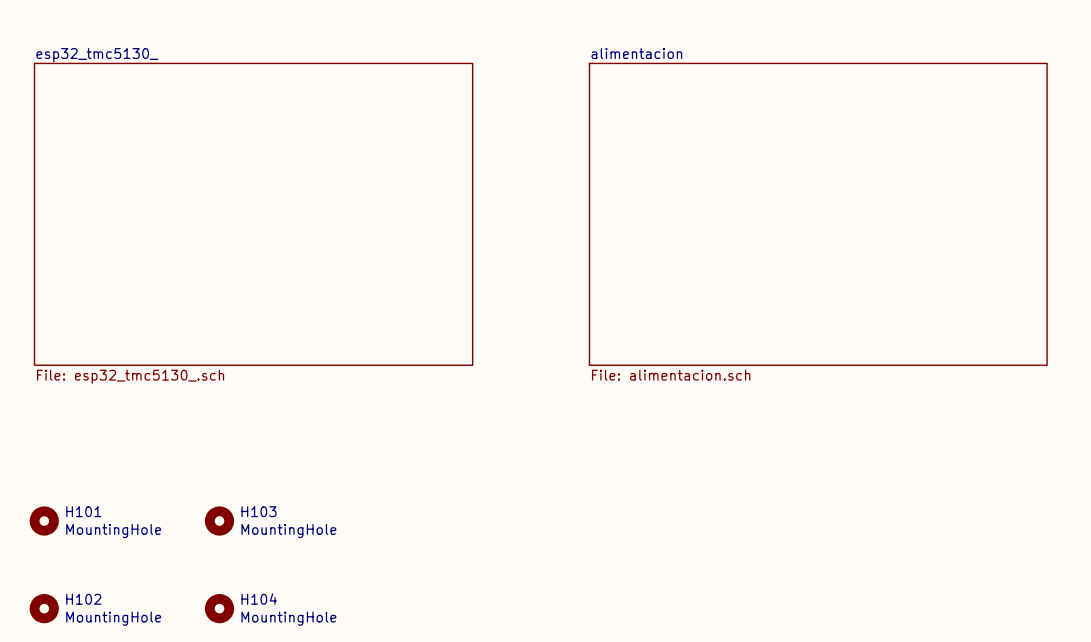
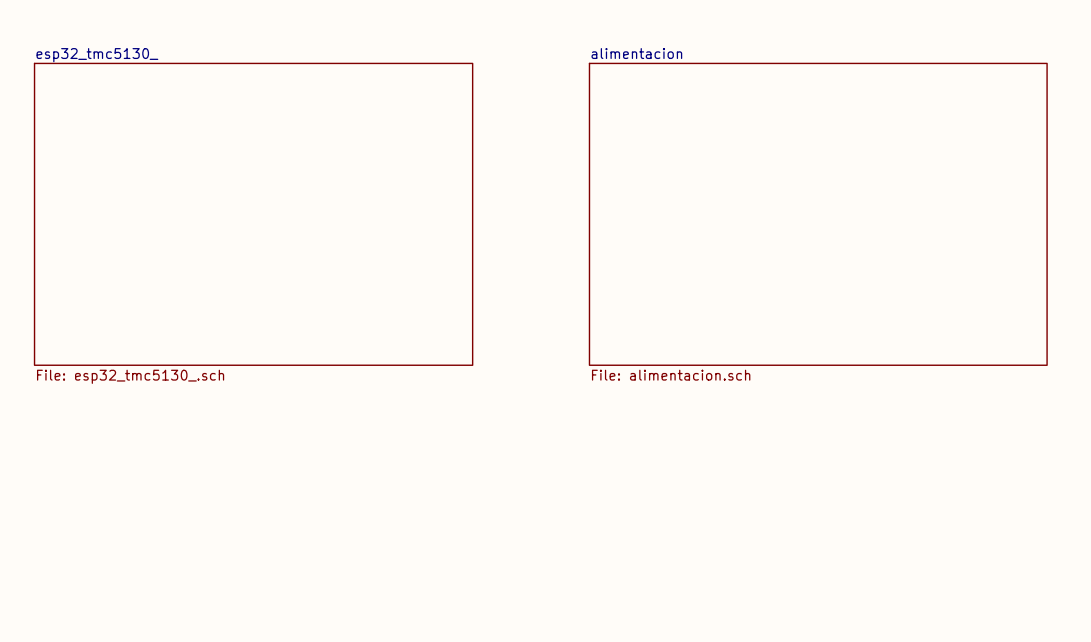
H101: MountingHole (44, 521) -> none
H103: MountingHole (219, 521) -> none
H102: MountingHole (44, 608) -> none
H104: MountingHole (219, 608) -> none

